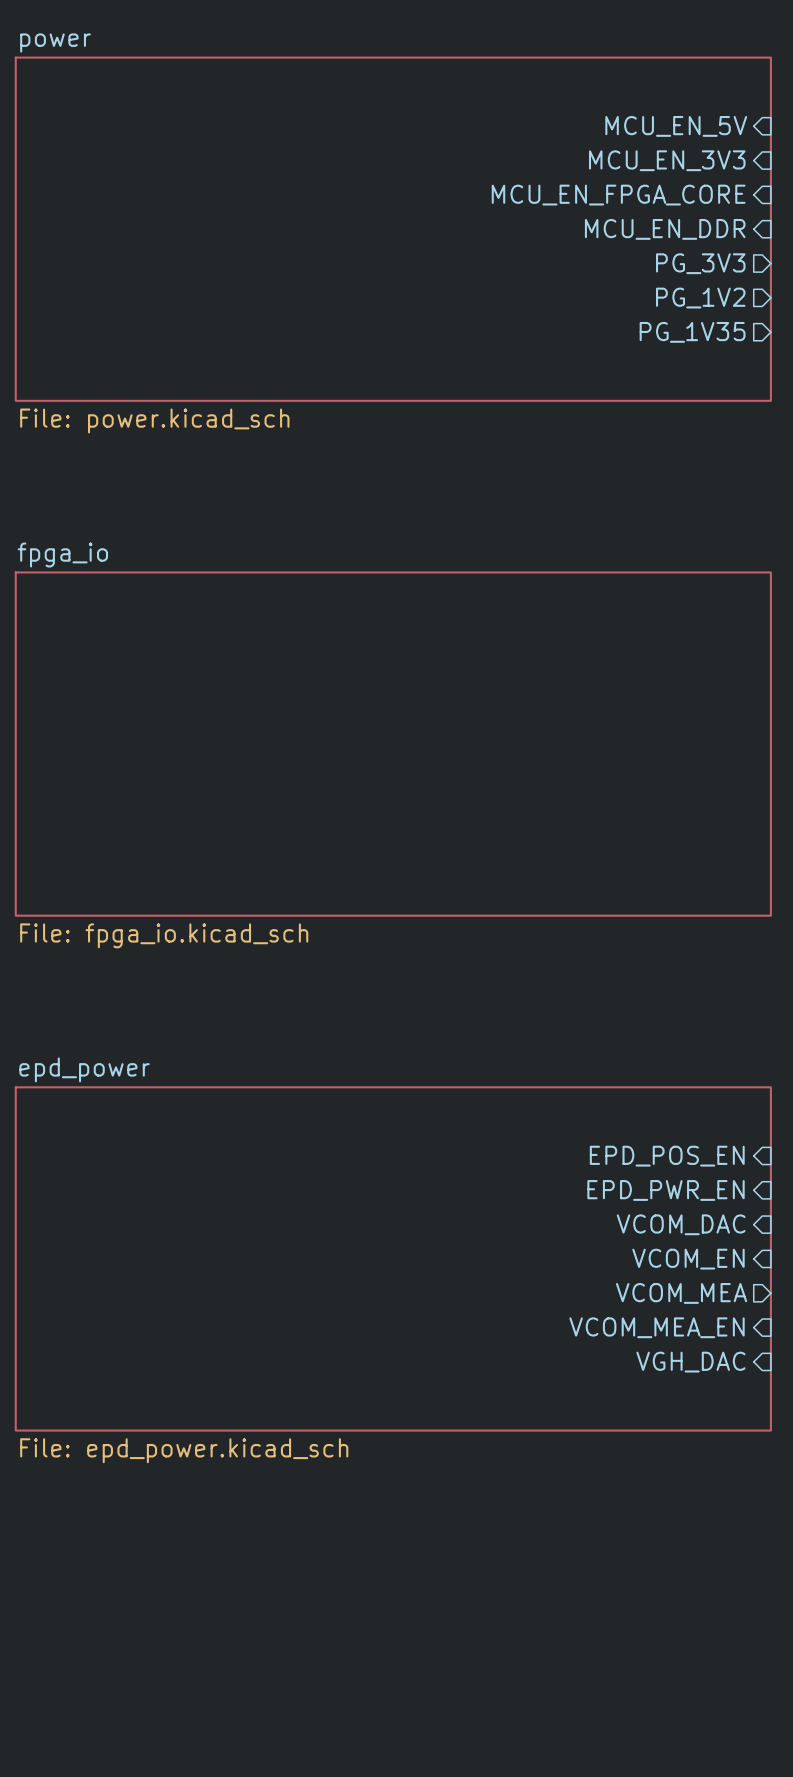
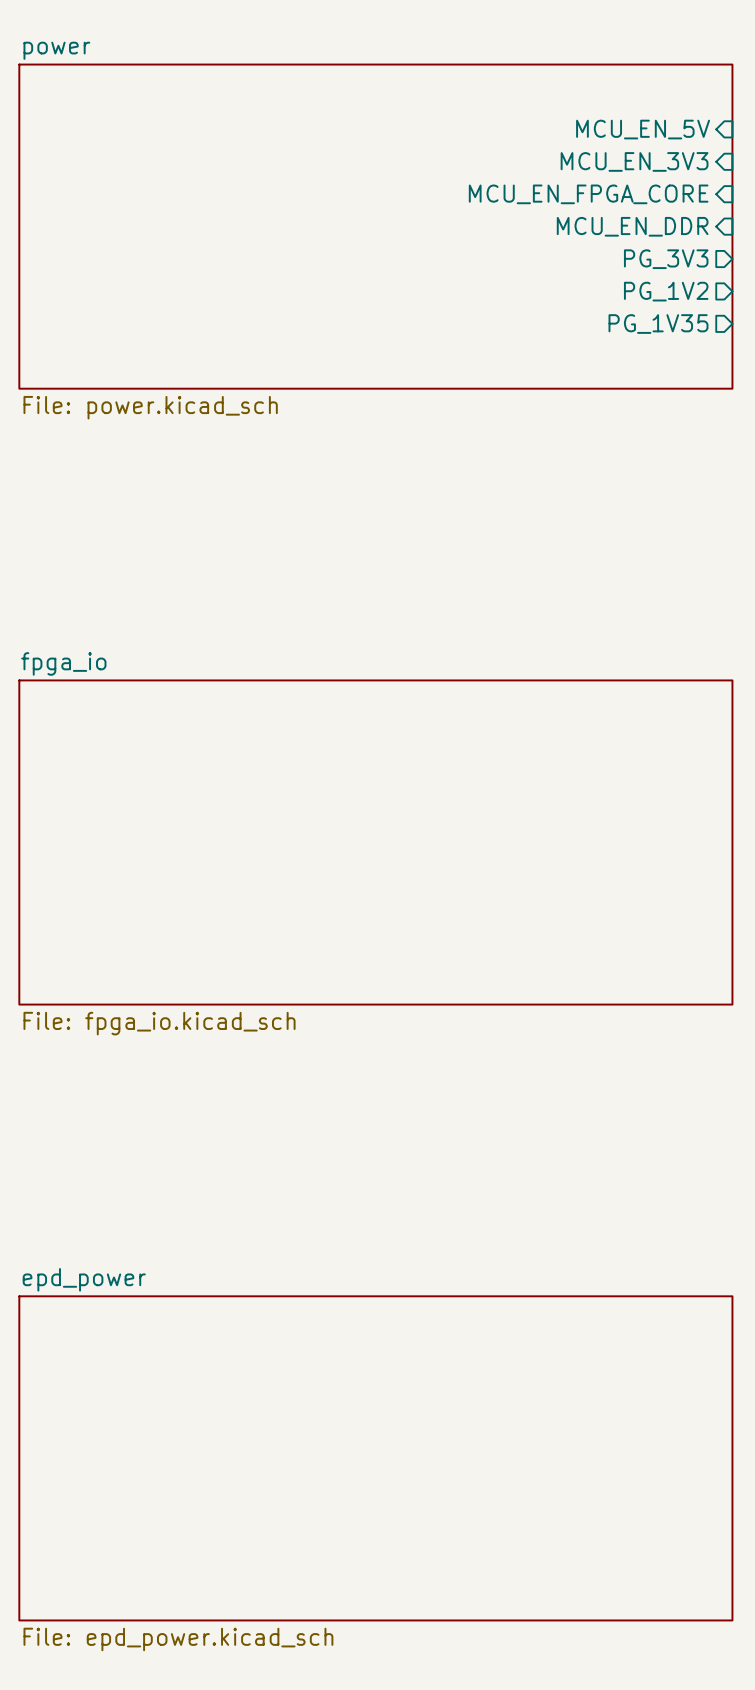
sheet fpga_io position: (393, 744) -> (375, 842)
sheet pin: EPD_POS_EN (667, 1156) -> none
sheet pin: EPD_PWR_EN (666, 1190) -> none
sheet pin: VCOM_DAC (681, 1224) -> none
sheet epd_power position: (393, 1258) -> (375, 1458)
sheet pin: VCOM_EN (688, 1259) -> none
sheet pin: VCOM_MEA (681, 1293) -> none
sheet pin: VCOM_MEA_EN (657, 1327) -> none
sheet pin: VGH_DAC (690, 1362) -> none

